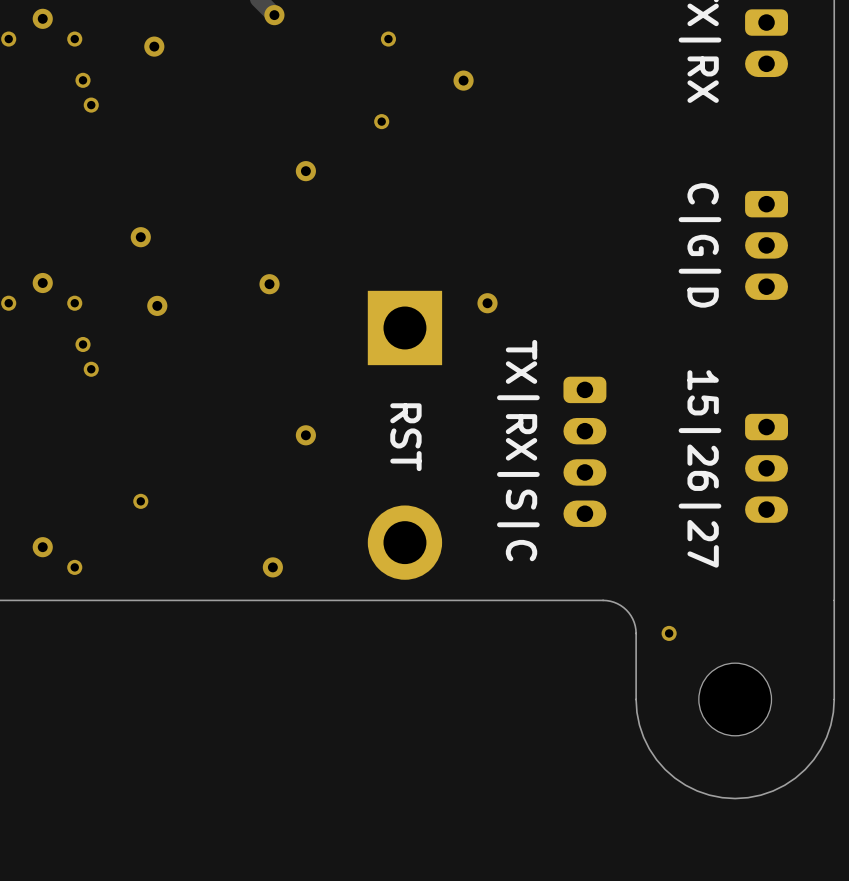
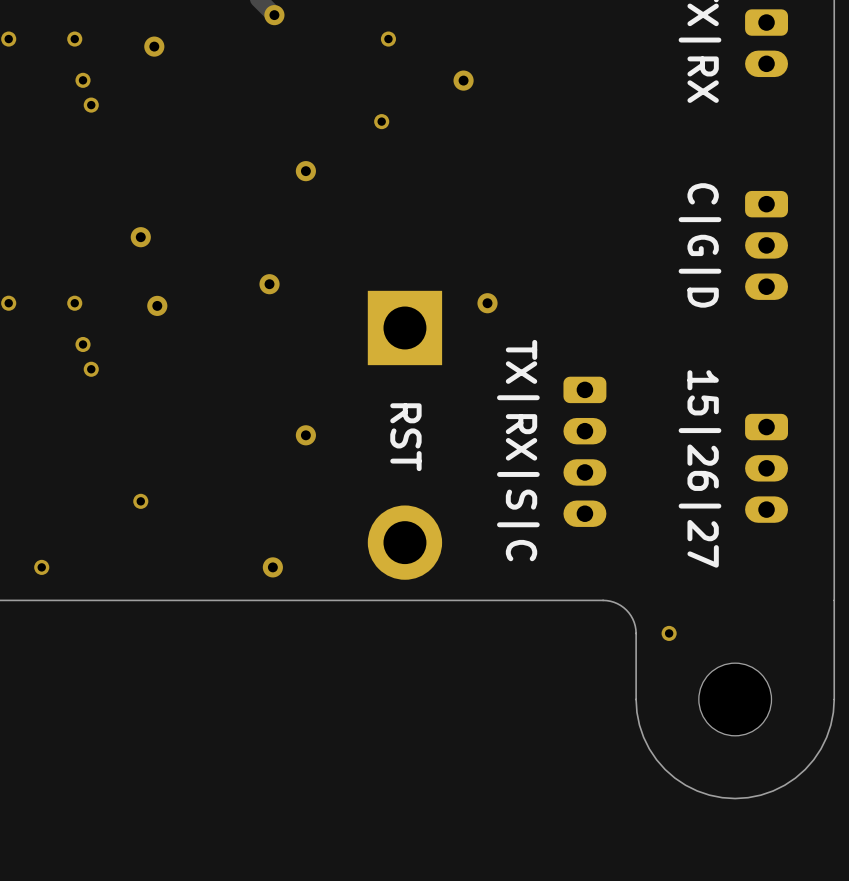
via: (42, 18) -> none
via: (42, 283) -> none
via: (42, 547) -> none
via position: (74, 567) -> (41, 567)

